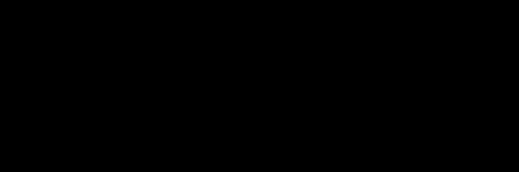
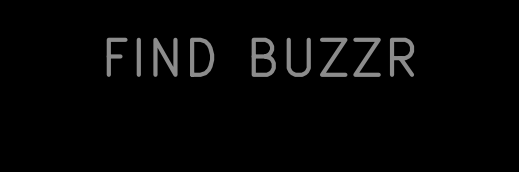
text: none -> FIND BUZZR (260, 57)

